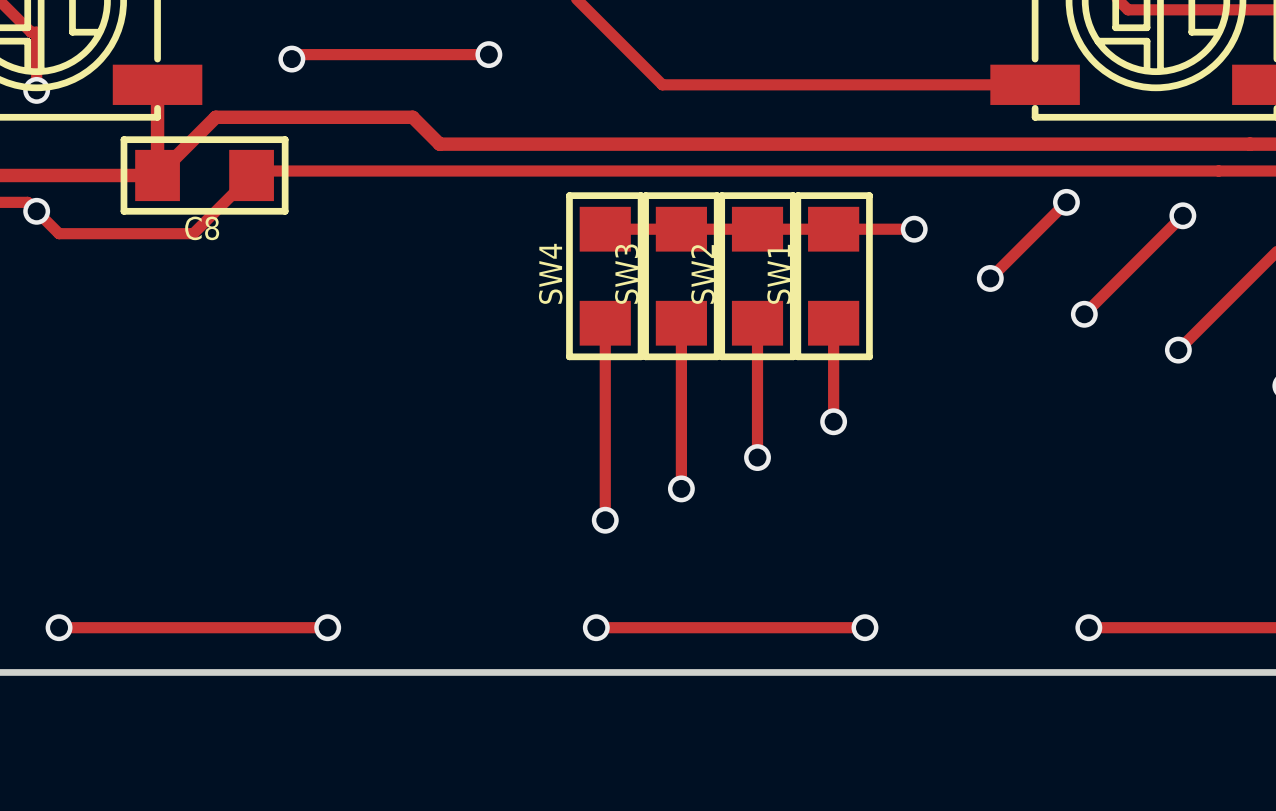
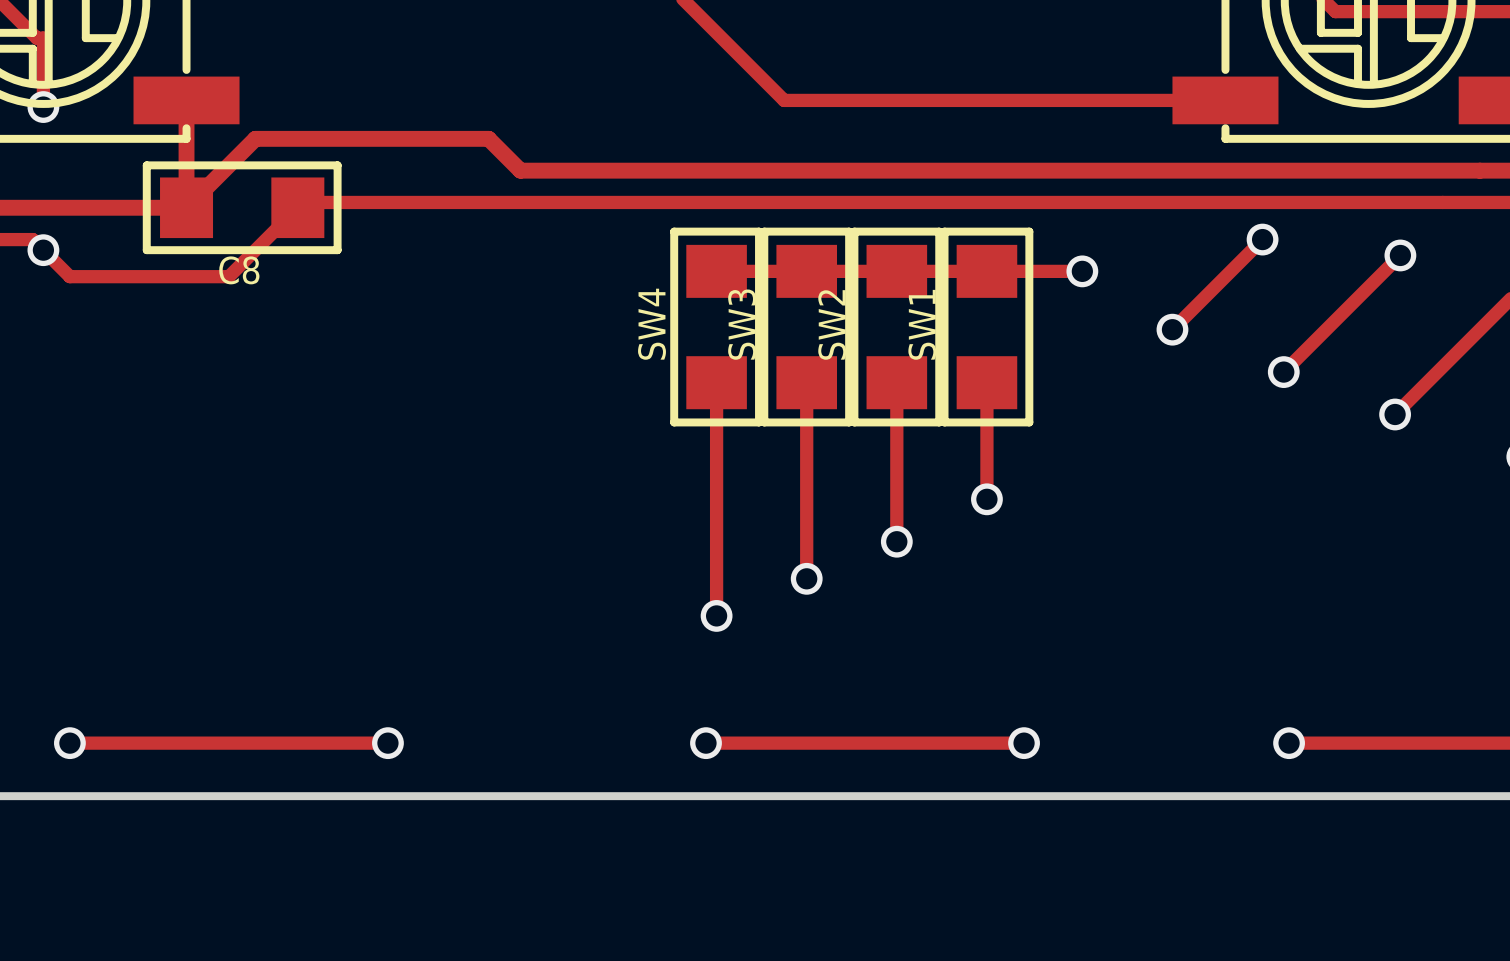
track: (488, 54) (296, 54) (291, 59) -> none
via: (488, 54) -> none
via: (291, 59) -> none

